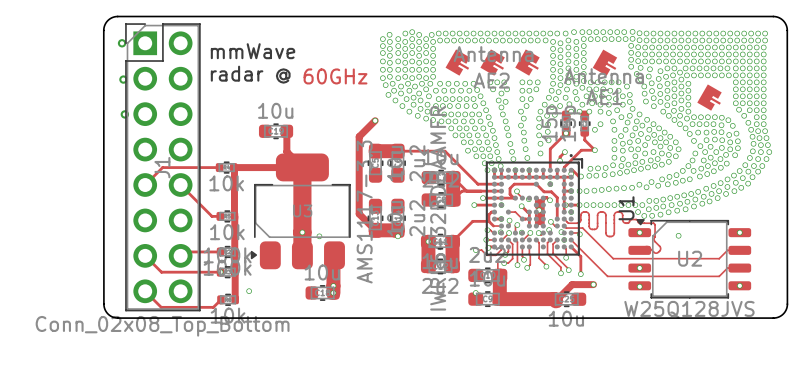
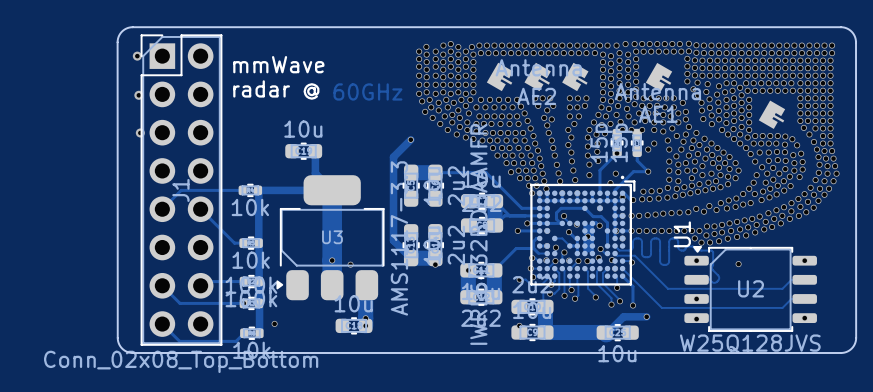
track: (564, 152) (560, 156) (560, 160) -> none

